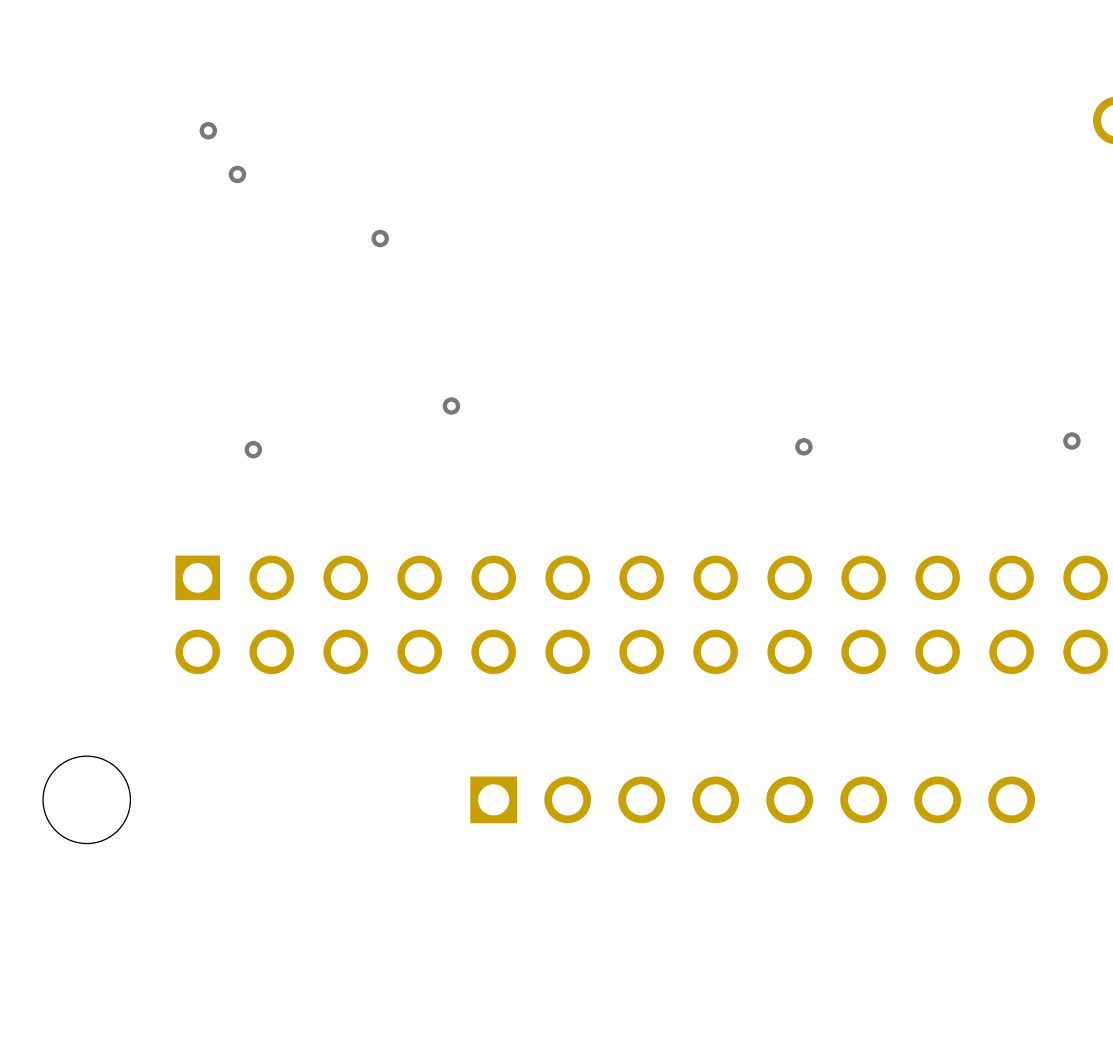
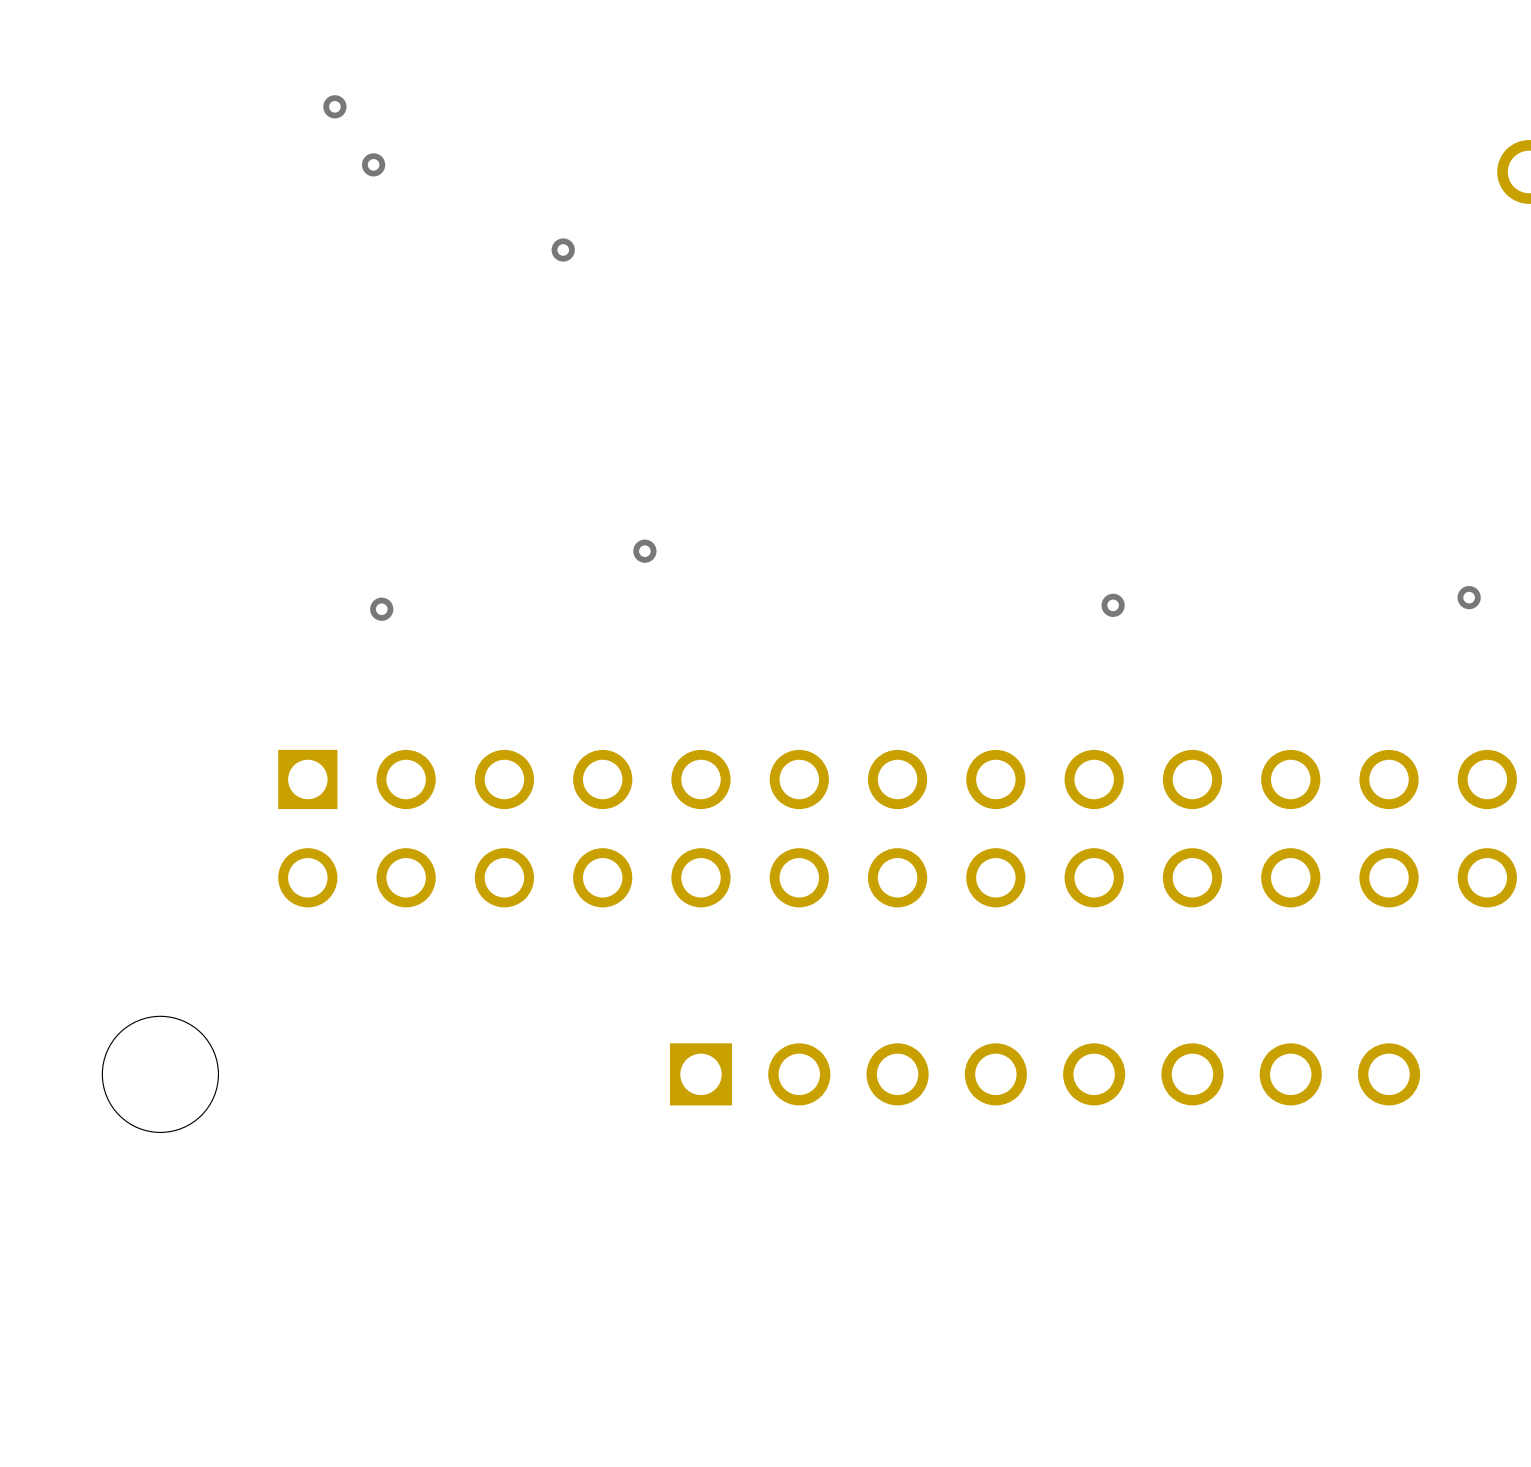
via: none -> (334, 106)
via: none -> (373, 164)
via: (208, 130) -> none
via: (237, 174) -> none
via position: (380, 238) -> (563, 249)

